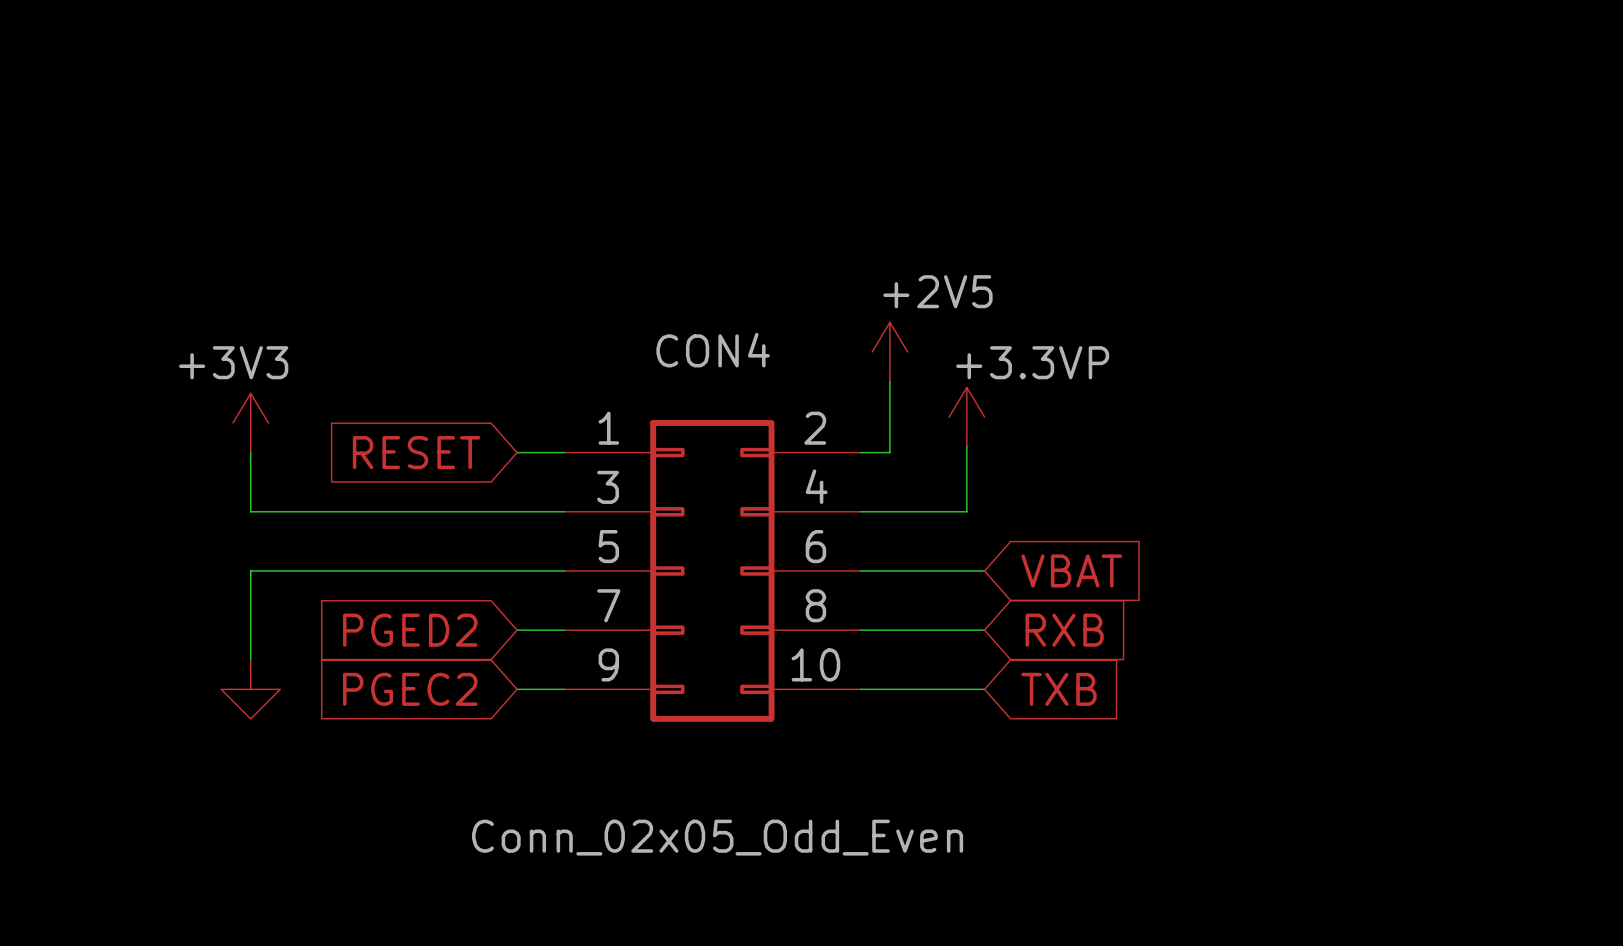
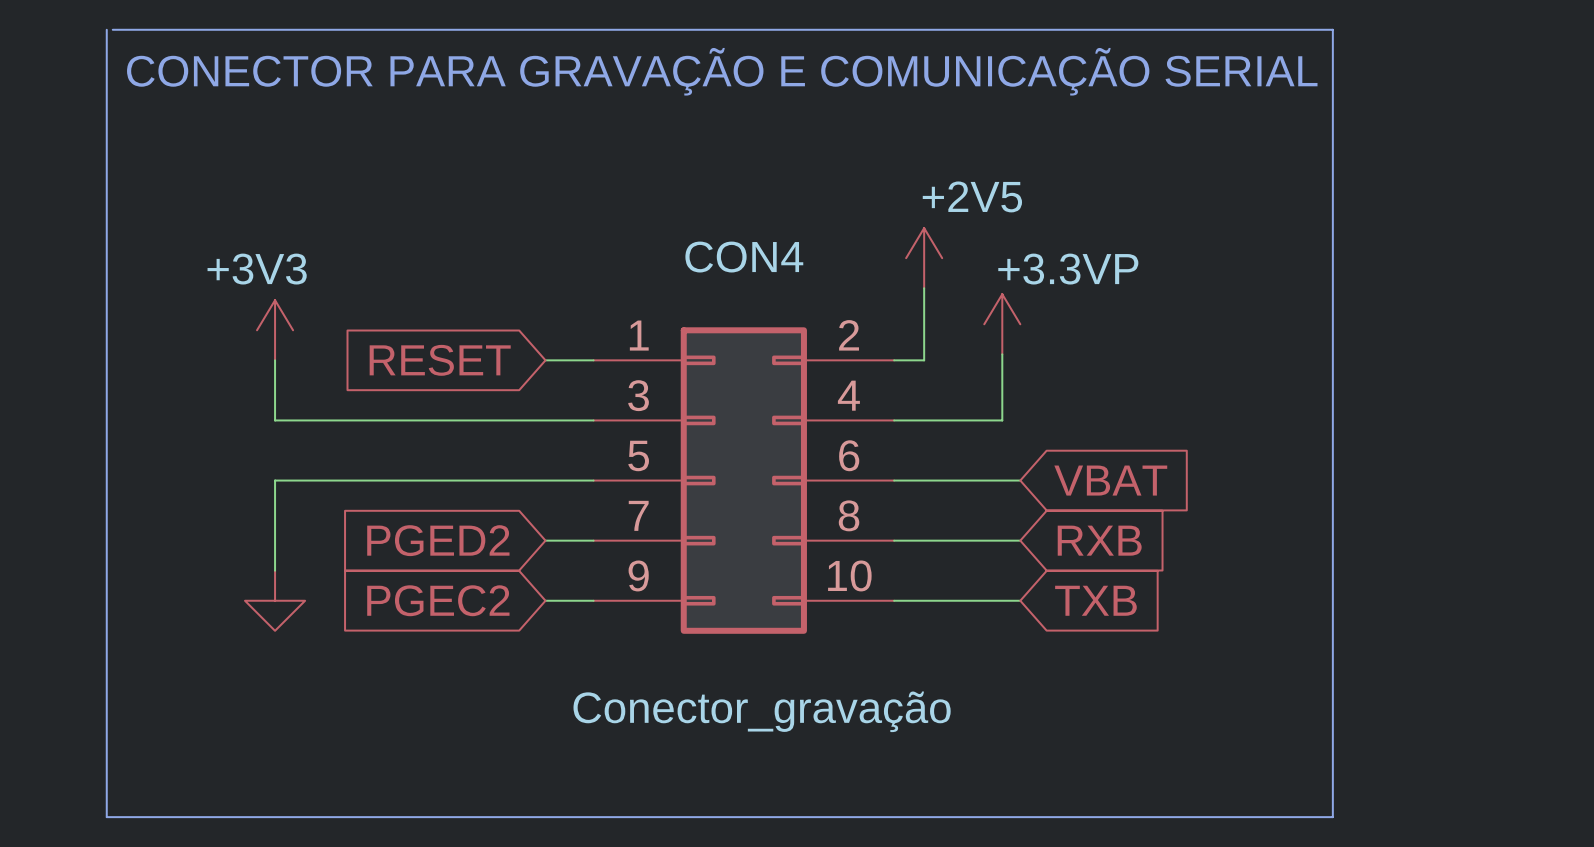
line: none -> (106, 29) (106, 817) (1332, 817) (1332, 29) (112, 29)
text: none -> CONECTOR PARA GRAVAÇÃO E COMUNICAÇÃO SERIAL (722, 71)
CON4 value: Conn_02x05_Odd_Even (717, 837) -> Conector_gravação (762, 711)

